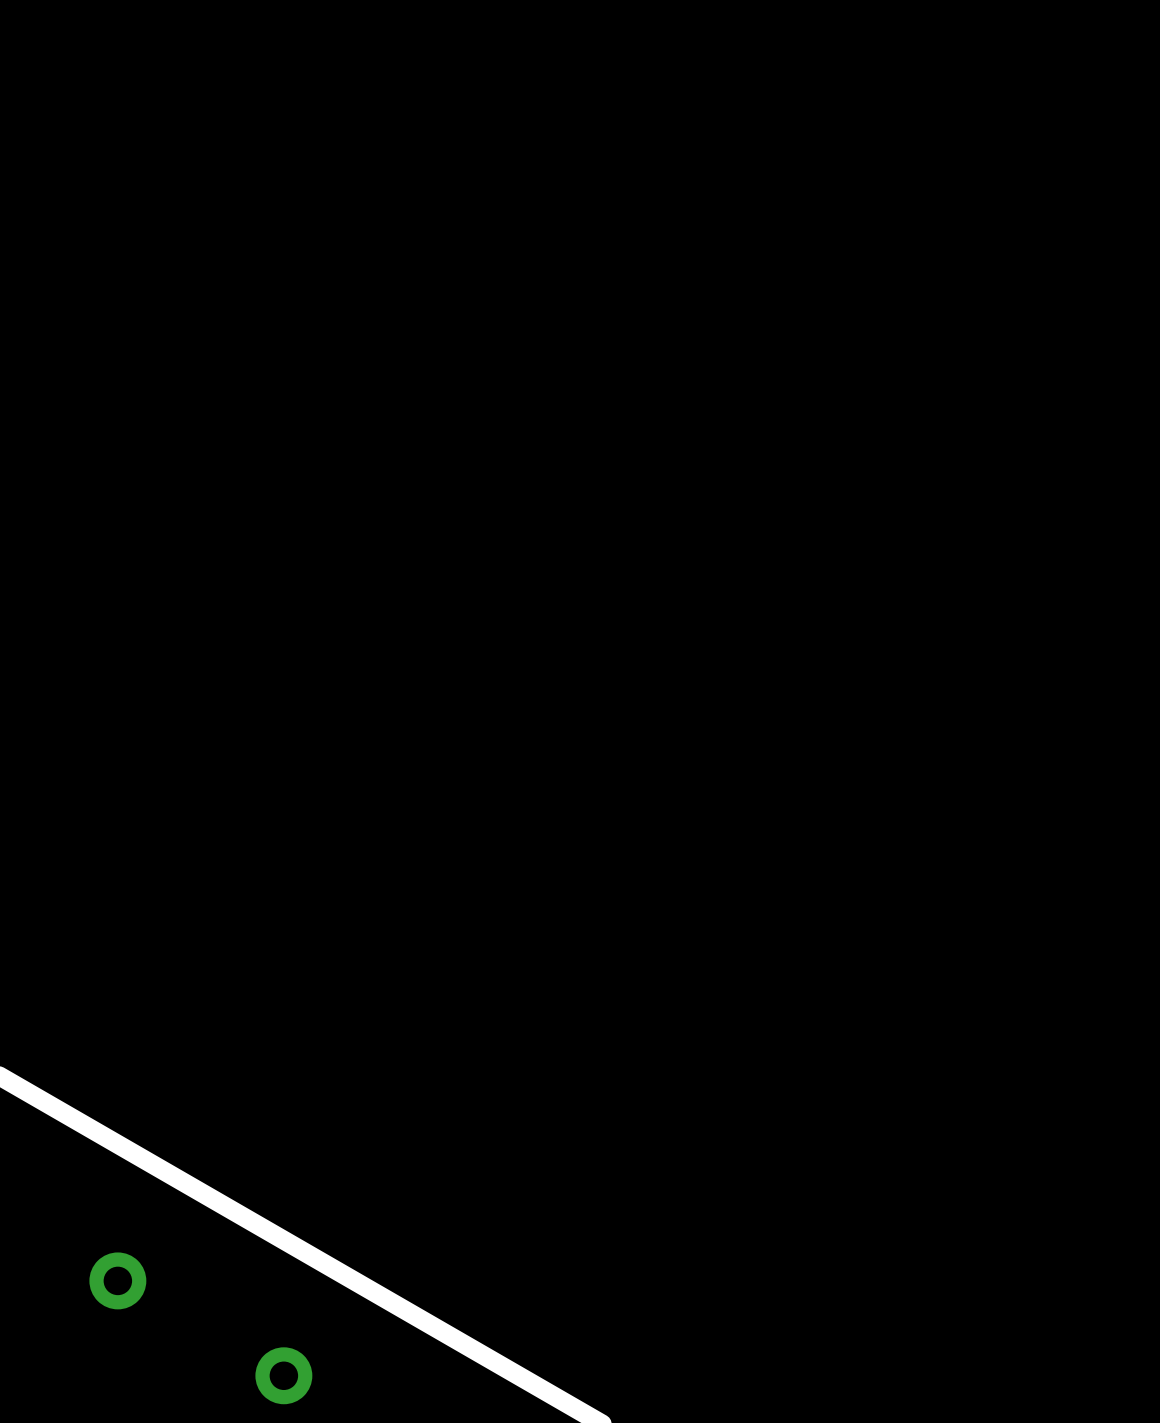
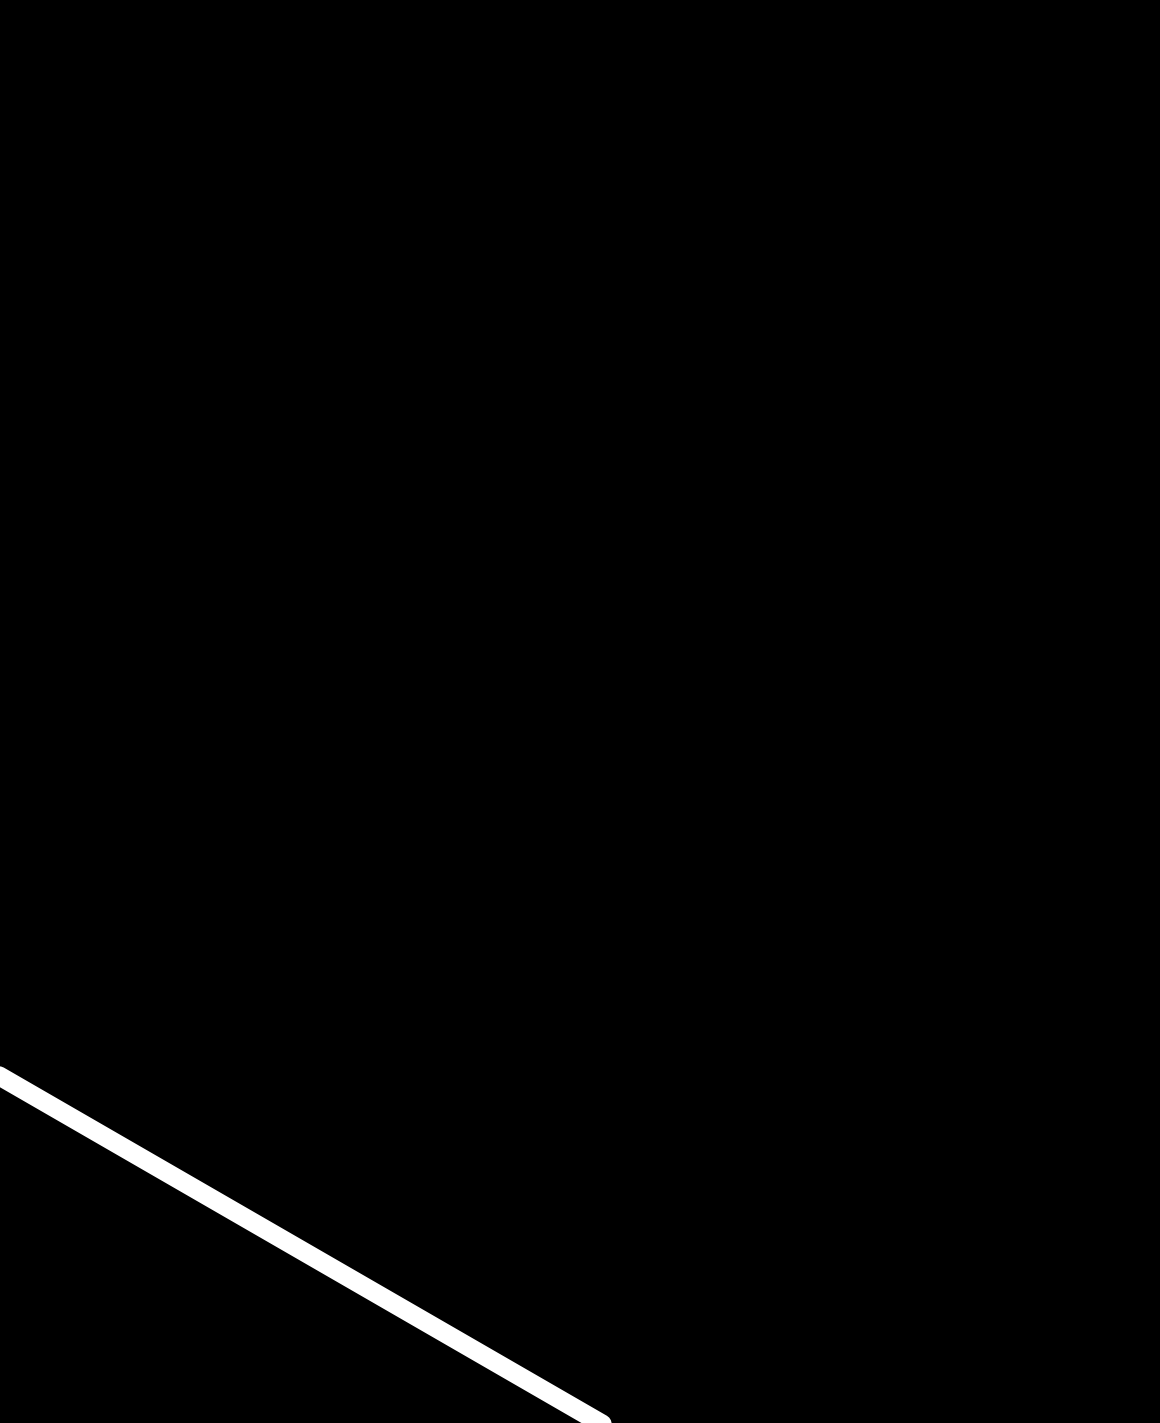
via: (117, 1280) -> none
via: (283, 1375) -> none

